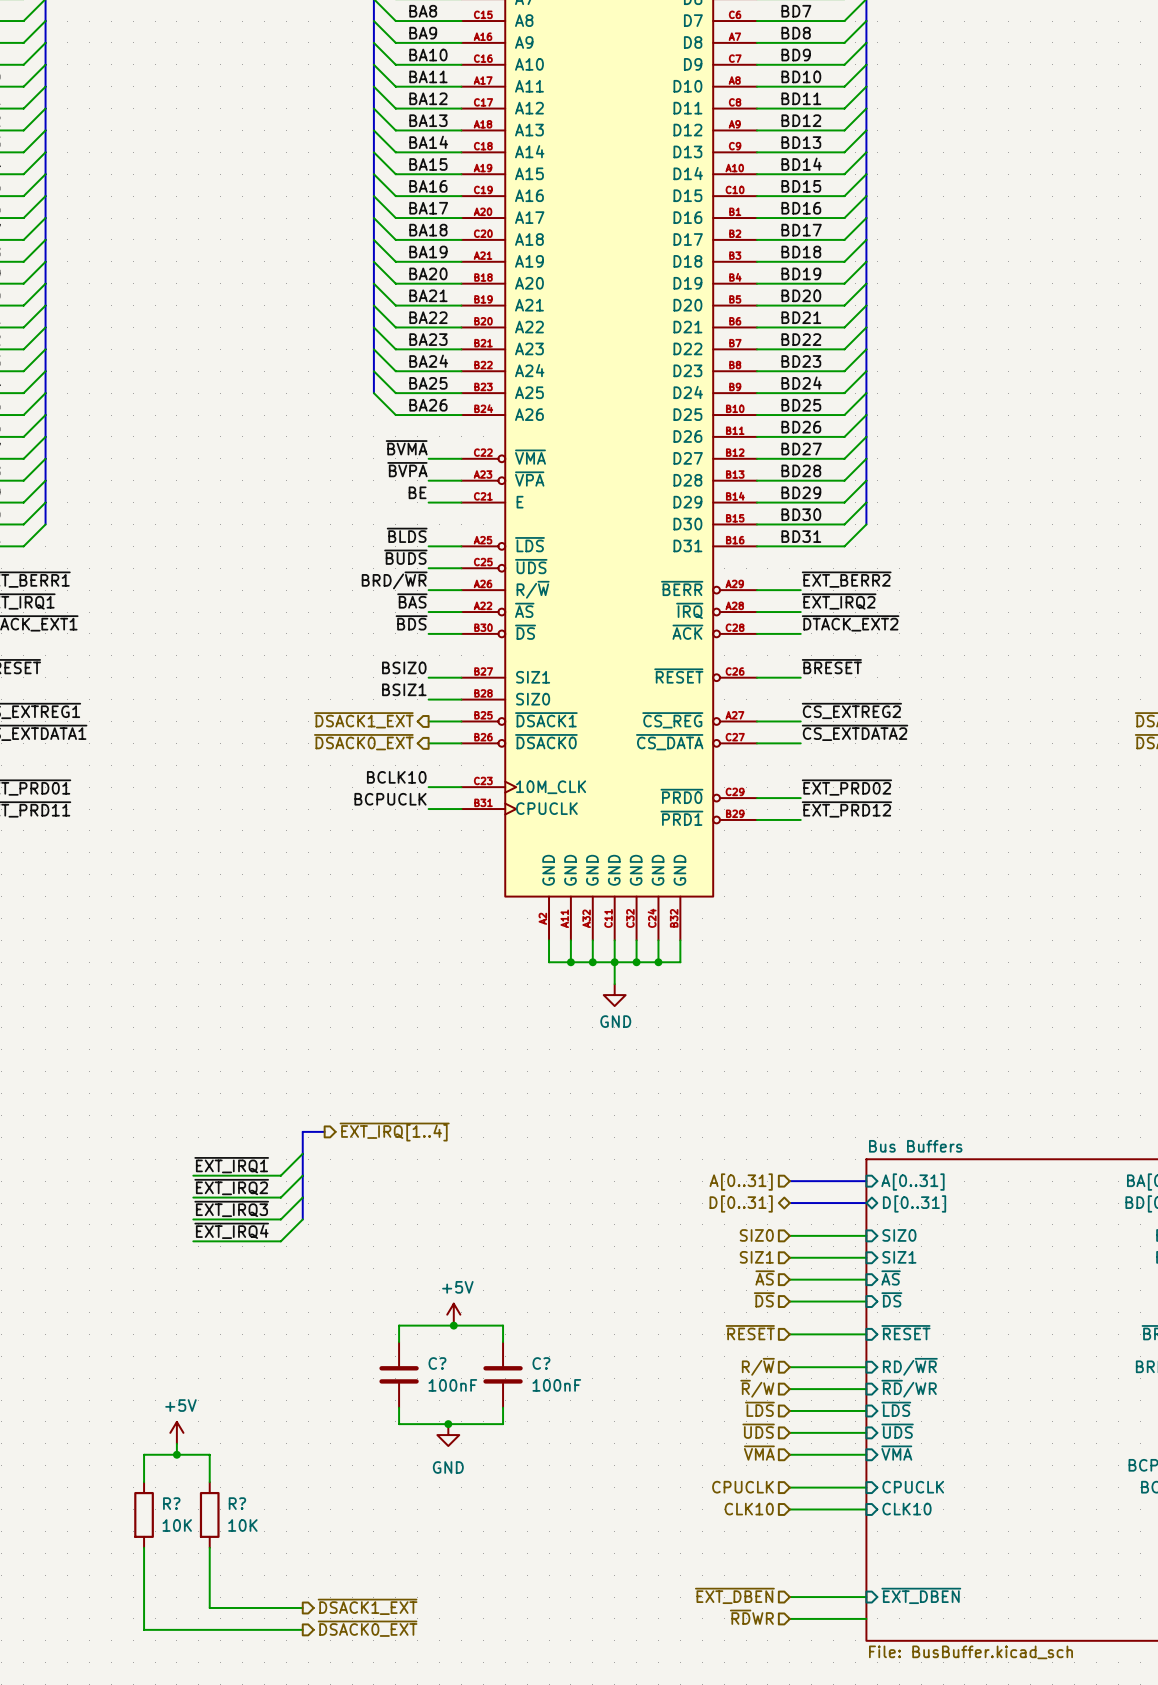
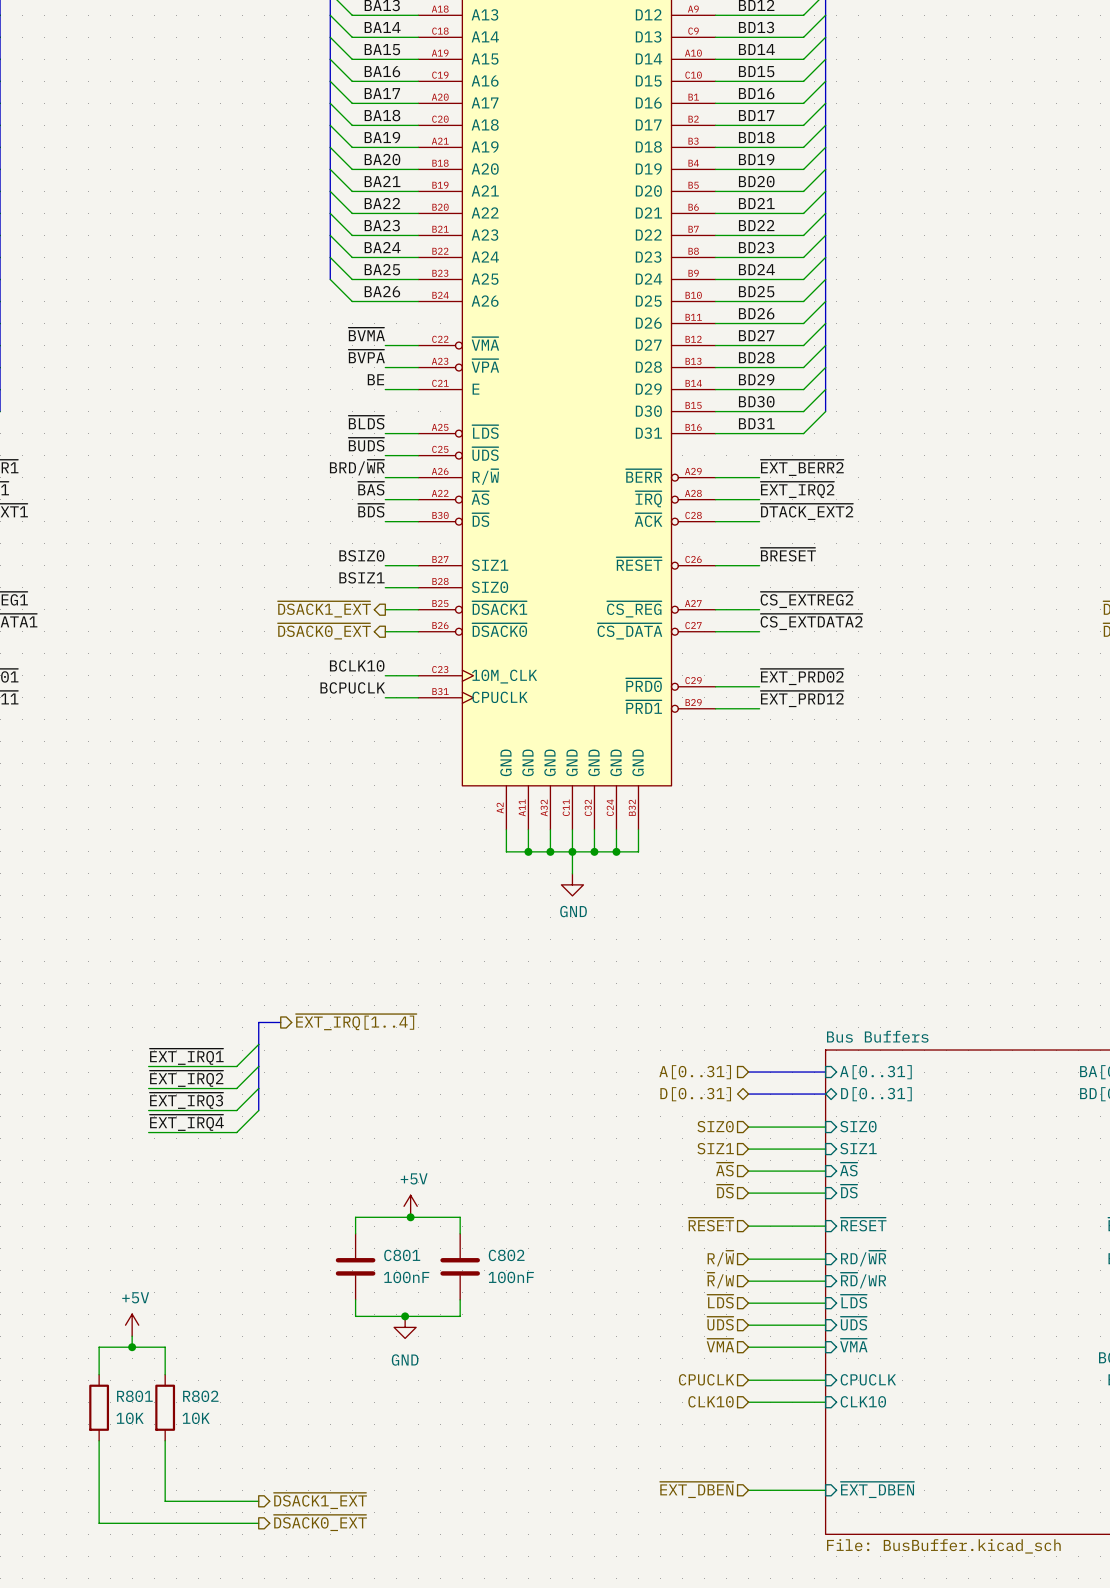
C? name: C? (437, 1363) -> C801 (402, 1255)
C? name: C? (541, 1363) -> C802 (506, 1255)
R? name: R? (171, 1503) -> R801 (134, 1396)
R? name: R? (237, 1503) -> R802 (200, 1396)
hierarchical label: ~{RD}WR (751, 1617) -> none
wire: (789, 1618) (866, 1618) -> none

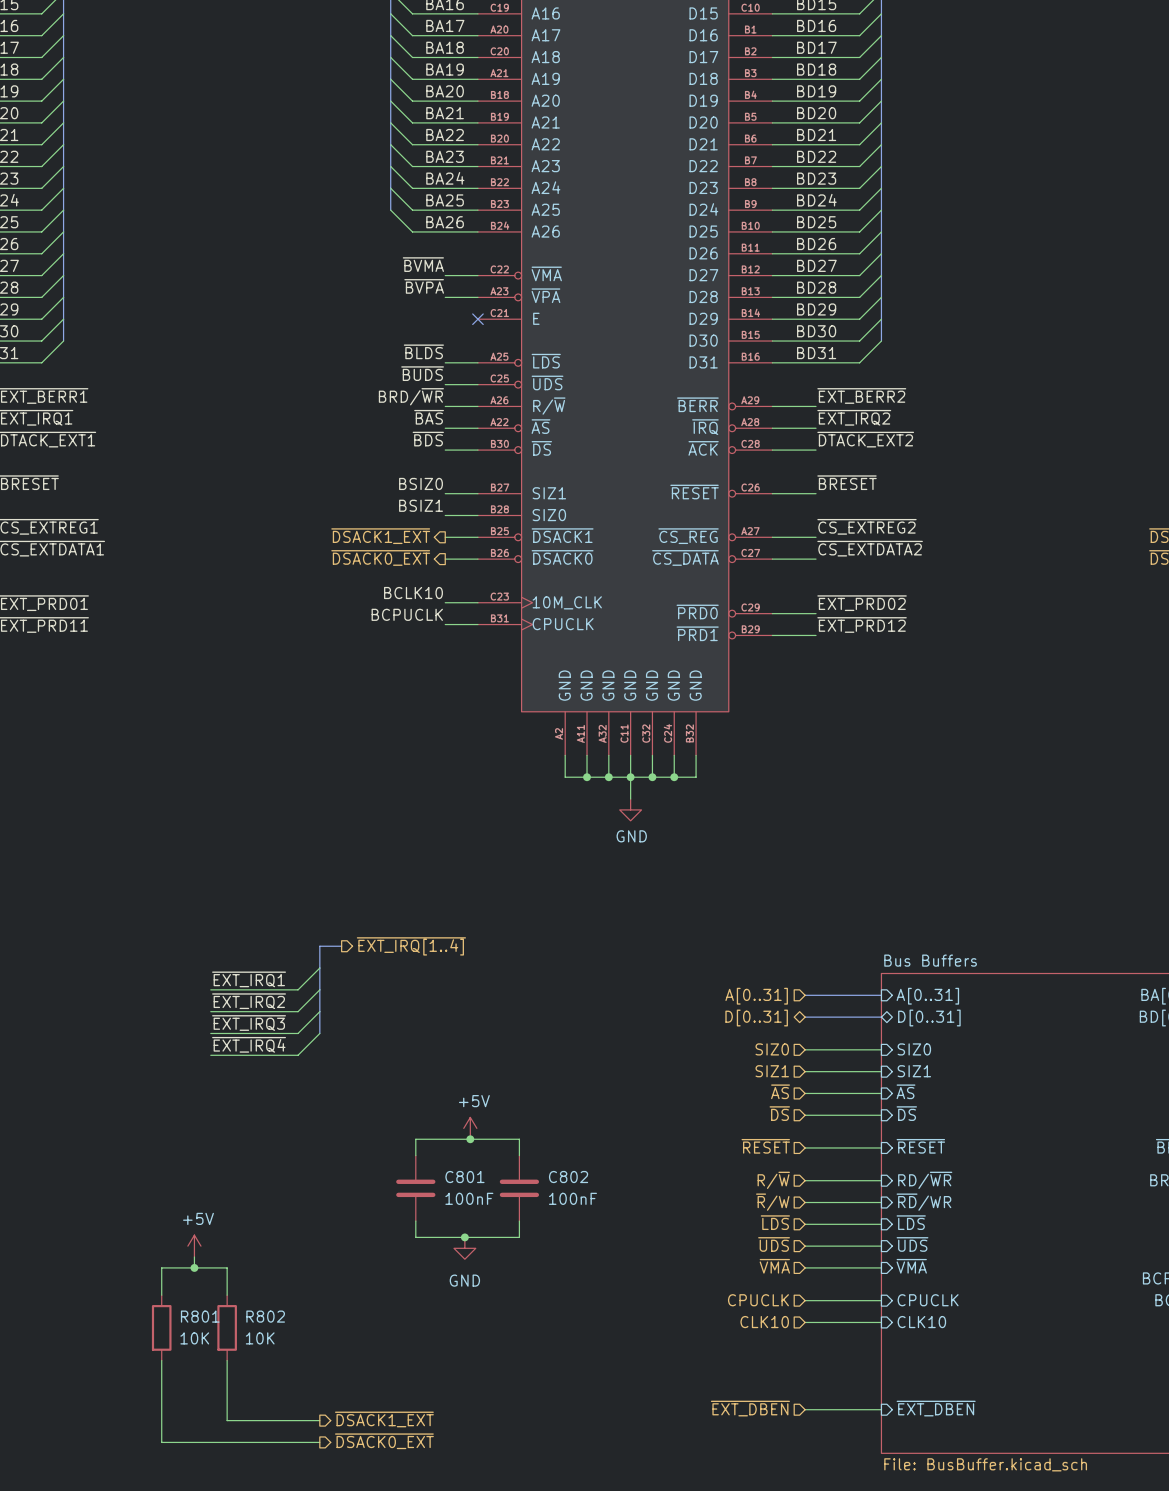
label: BE (375, 379) -> none
wire: (385, 389) (418, 389) -> none
no-connect mark: none -> (477, 319)

